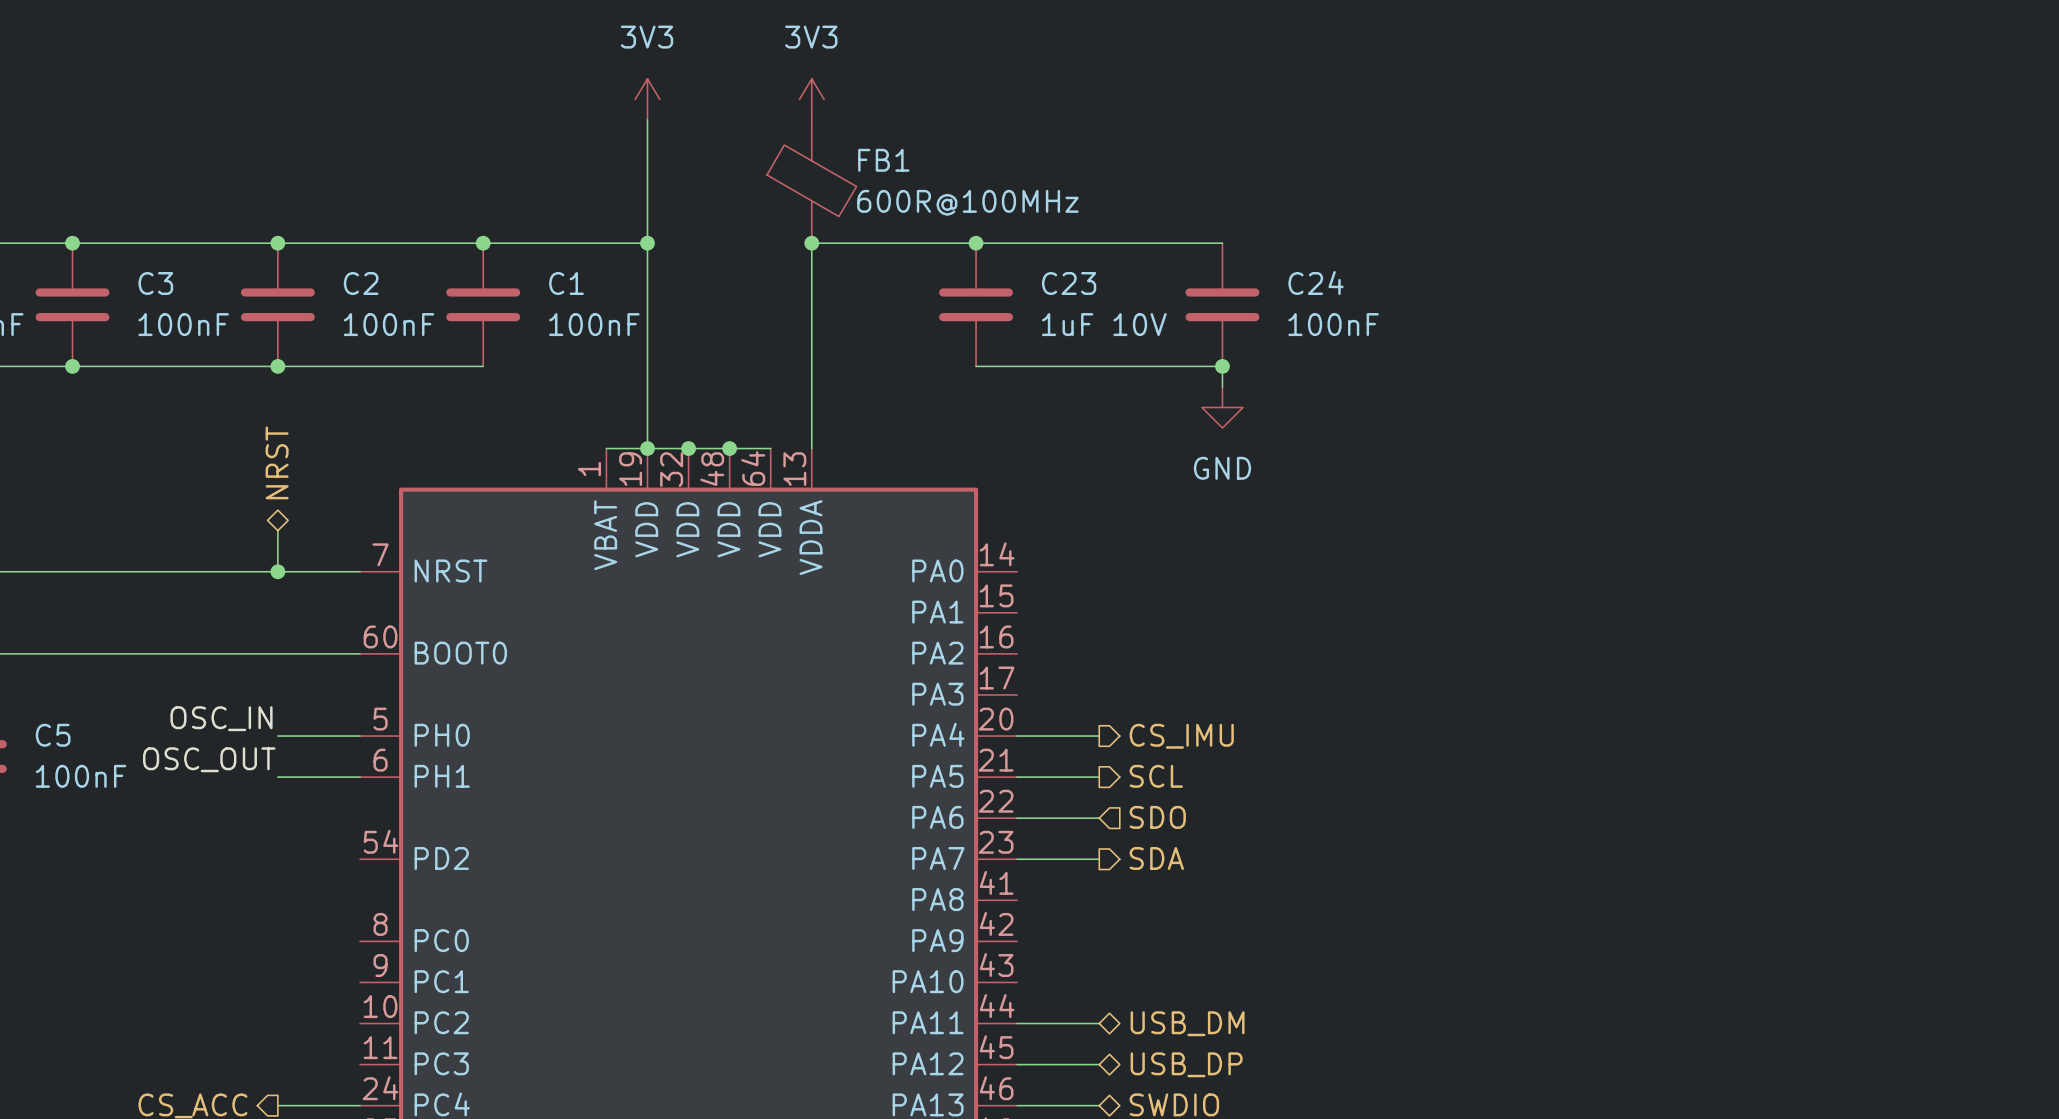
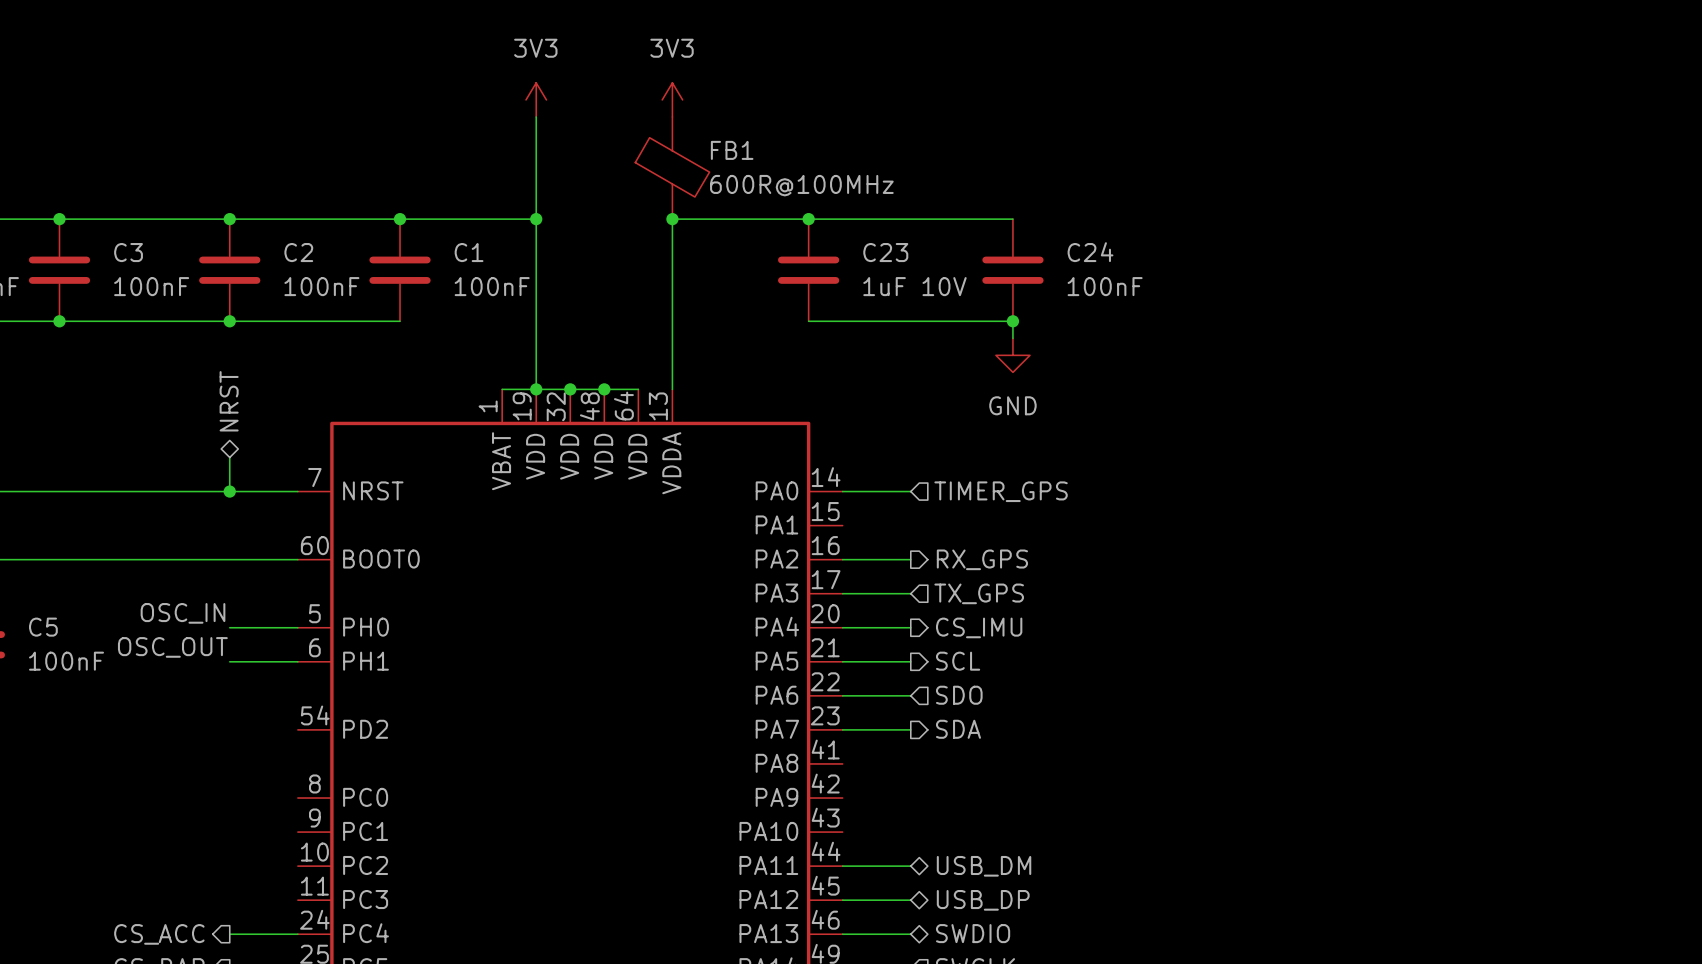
wire: none -> (842, 491) (910, 491)
hierarchical label: none -> TIMER_GPS (1001, 491)
wire: none -> (842, 559) (910, 559)
hierarchical label: none -> RX_GPS (982, 559)
wire: none -> (842, 593) (910, 593)
hierarchical label: none -> TX_GPS (979, 593)

